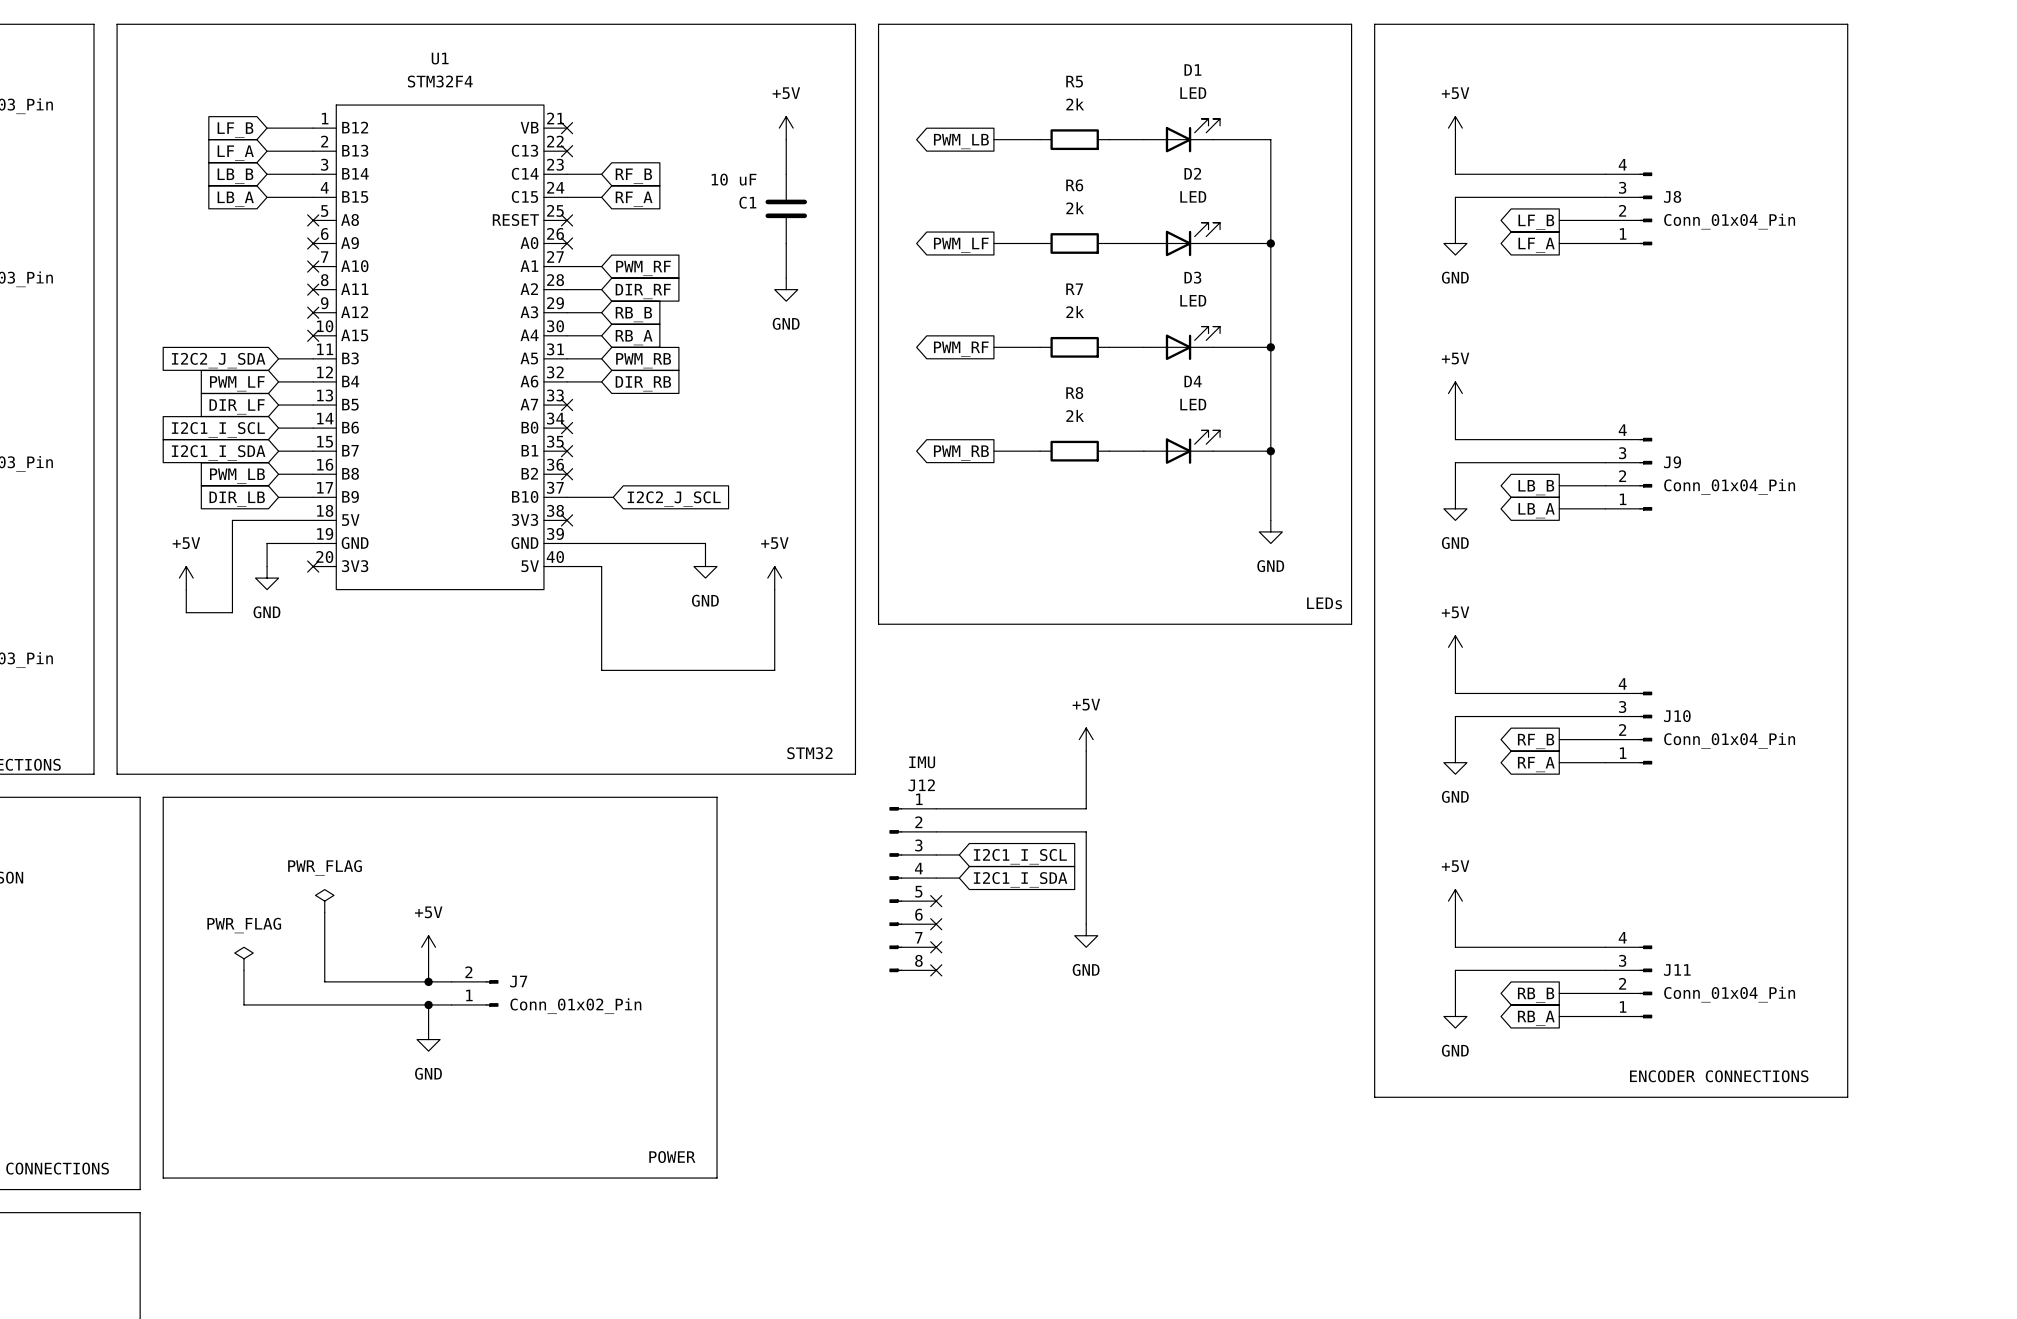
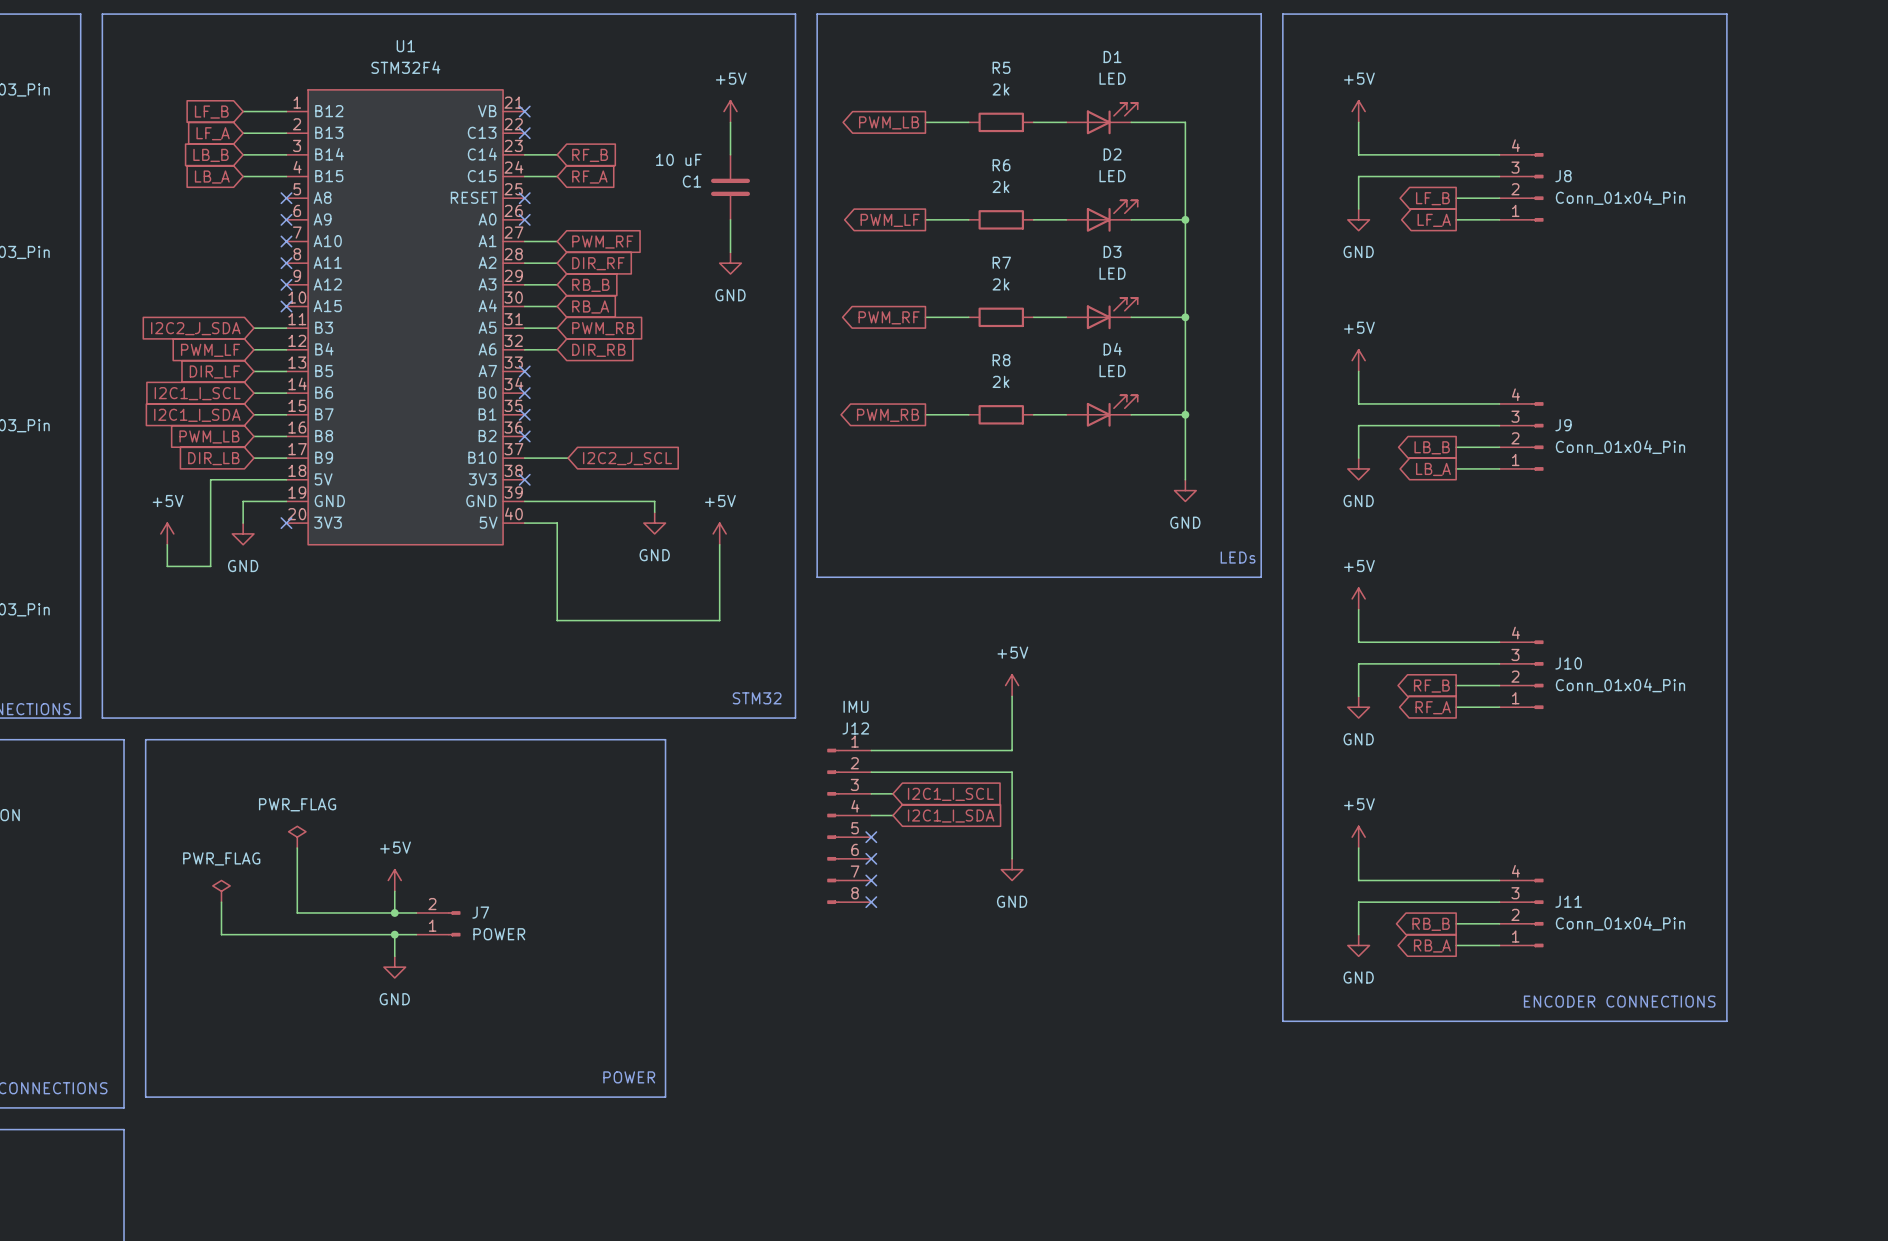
J7 value: Conn_01x02_Pin (575, 1006) -> POWER (499, 934)

